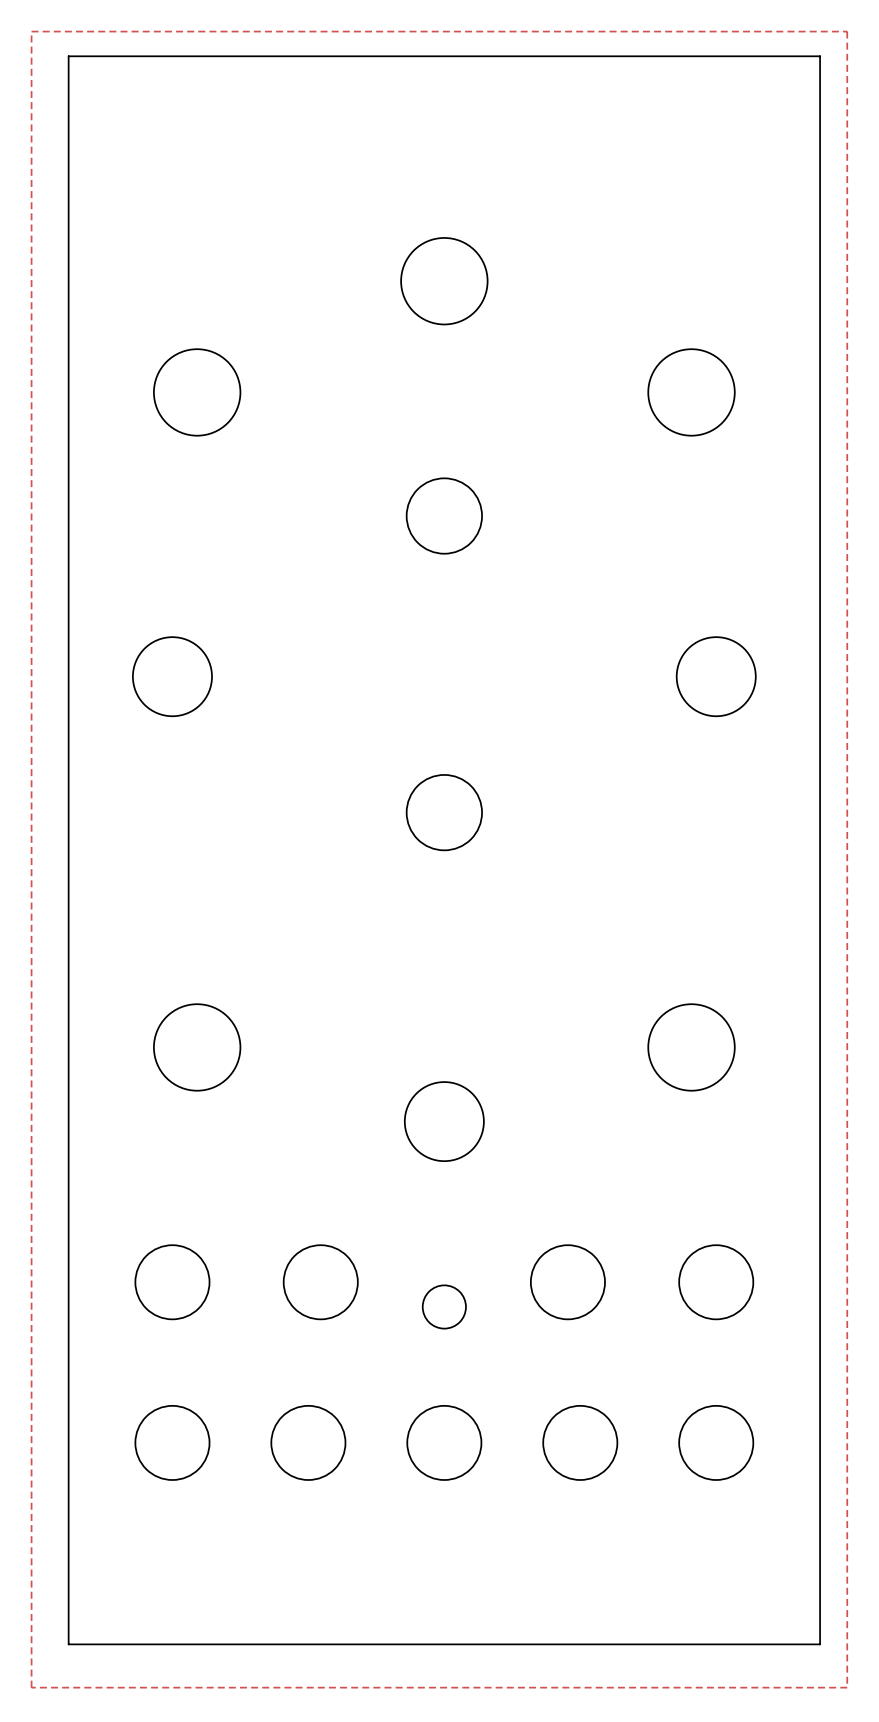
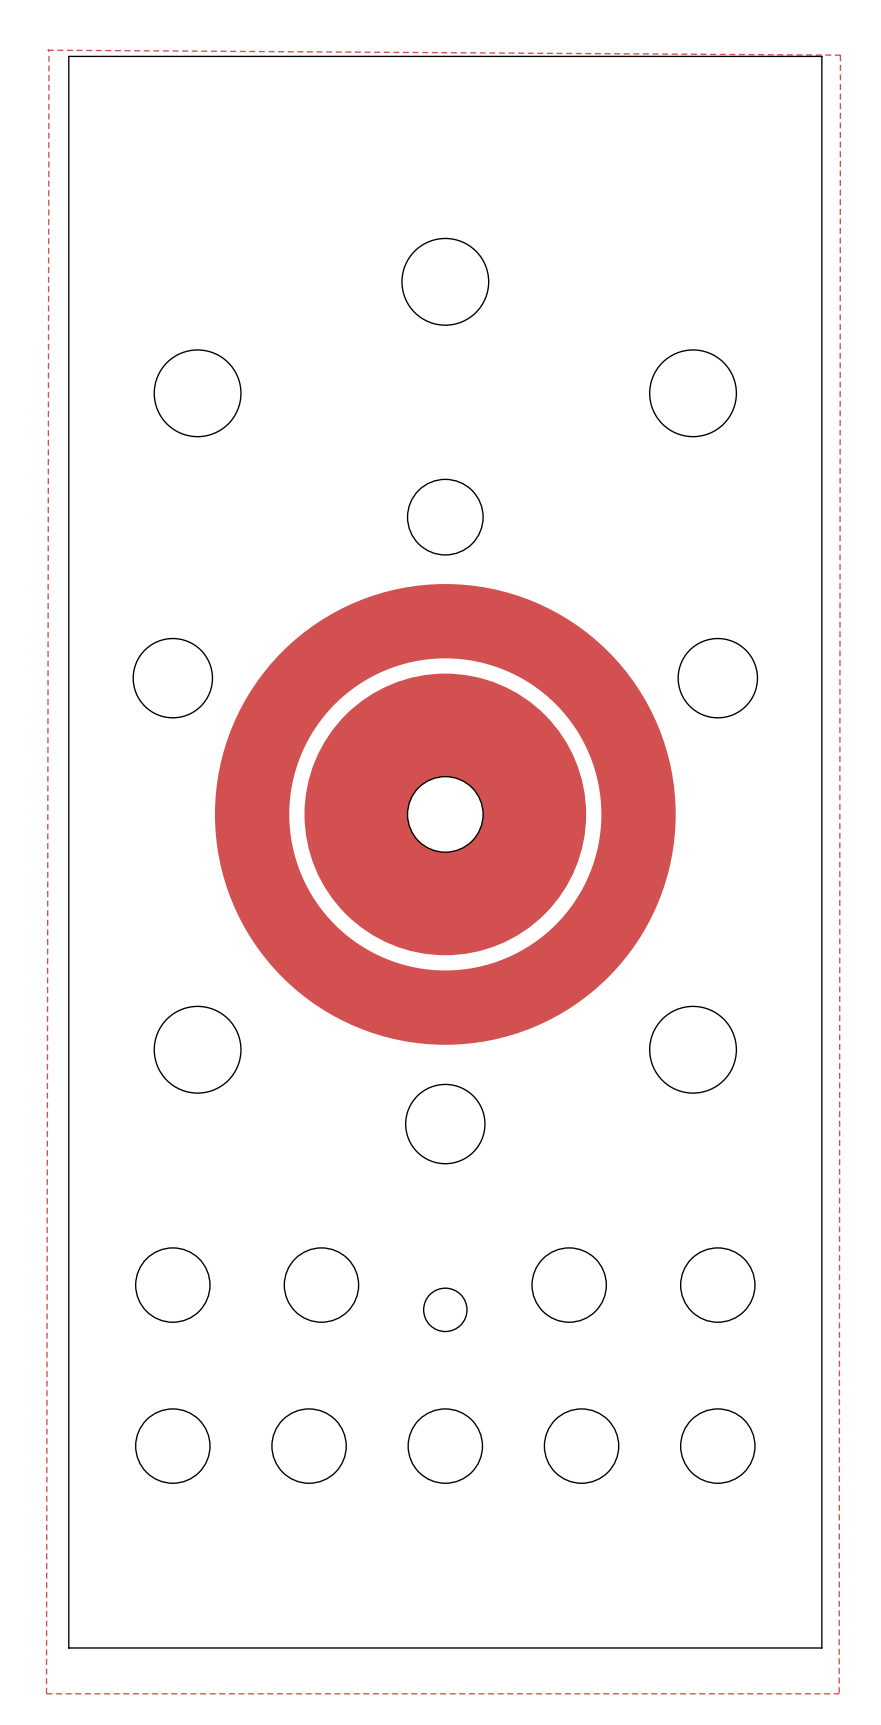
zone outline: (31, 31) (31, 1687) (847, 1687) (847, 31) (31, 31) -> (47, 50) (46, 1693) (839, 1693) (840, 55) (47, 50)
drawing: none -> [214, 584, 676, 1045]

